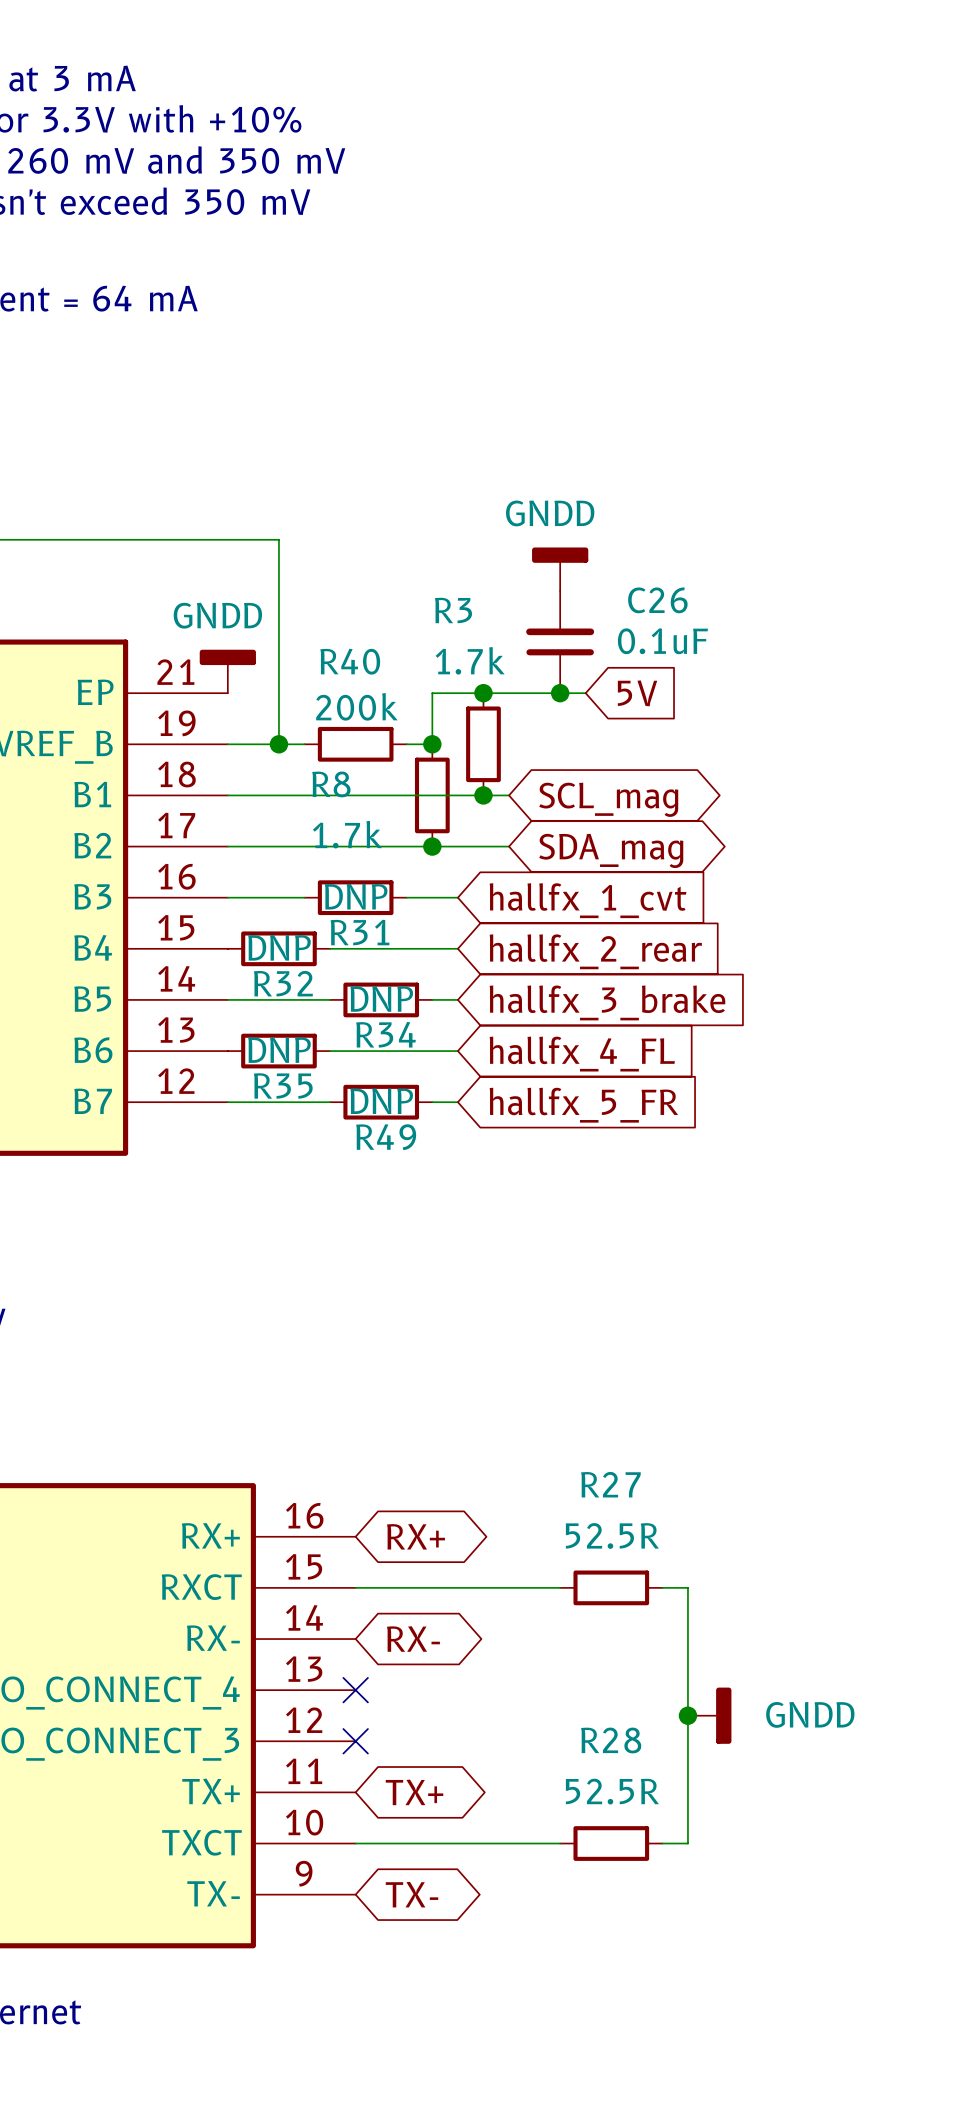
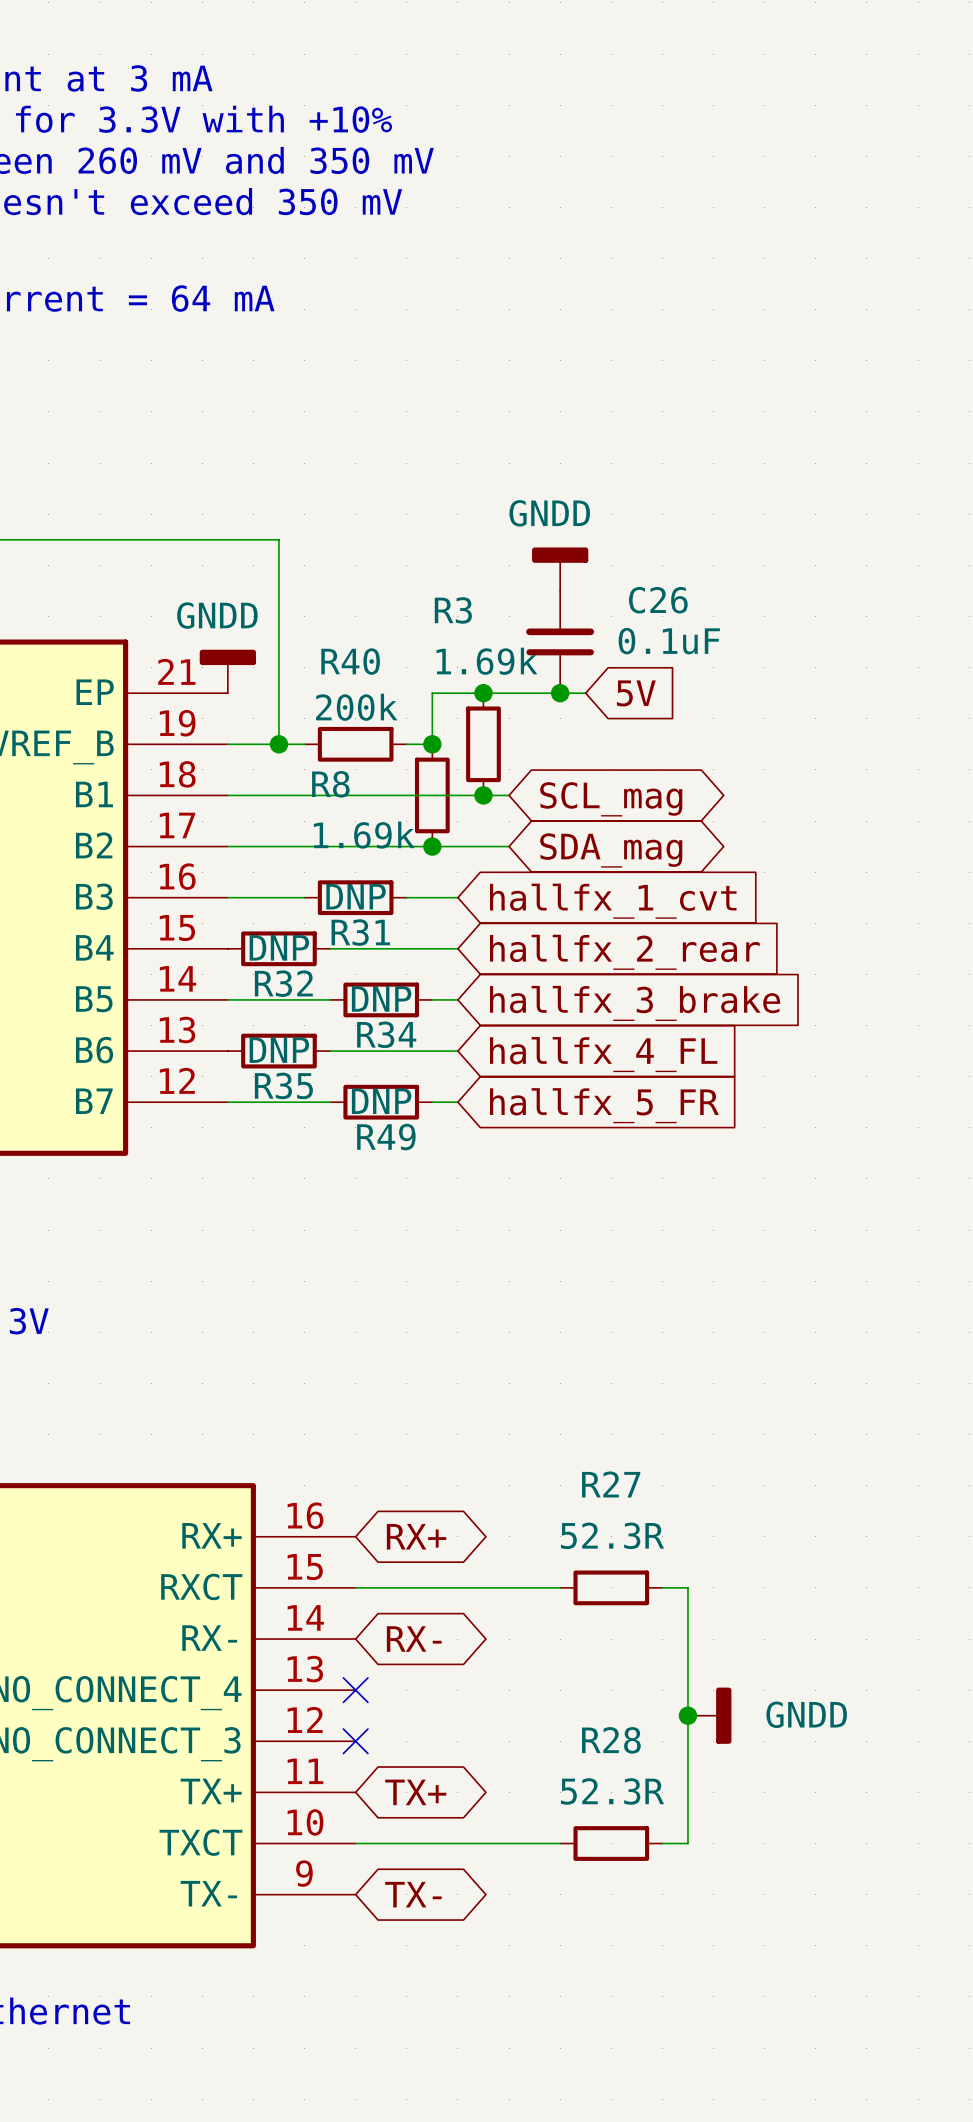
R3 value: 1.7k (470, 660) -> 1.69k (486, 661)
R8 value: 1.7k (347, 834) -> 1.69k (364, 835)
R27 value: 52.5R (612, 1535) -> 52.3R (612, 1535)
R28 value: 52.5R (612, 1791) -> 52.3R (612, 1791)

